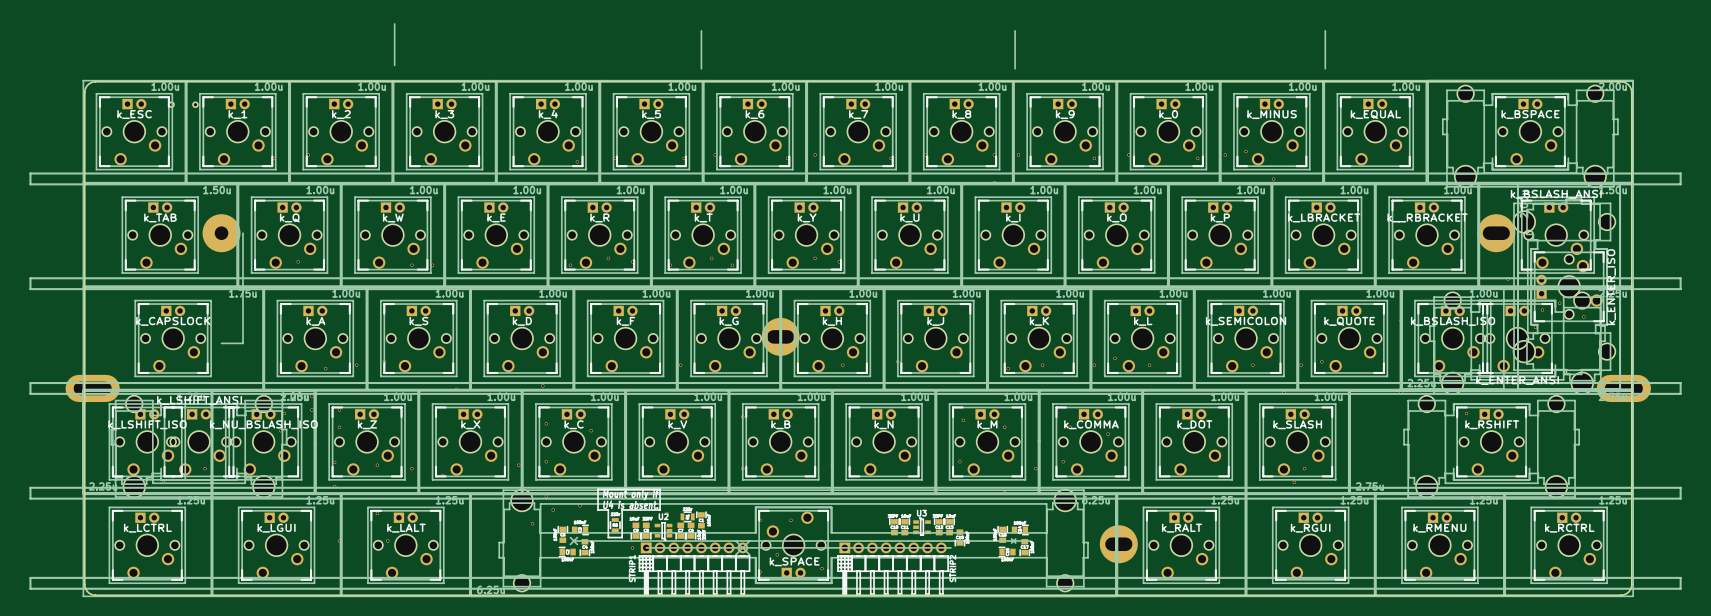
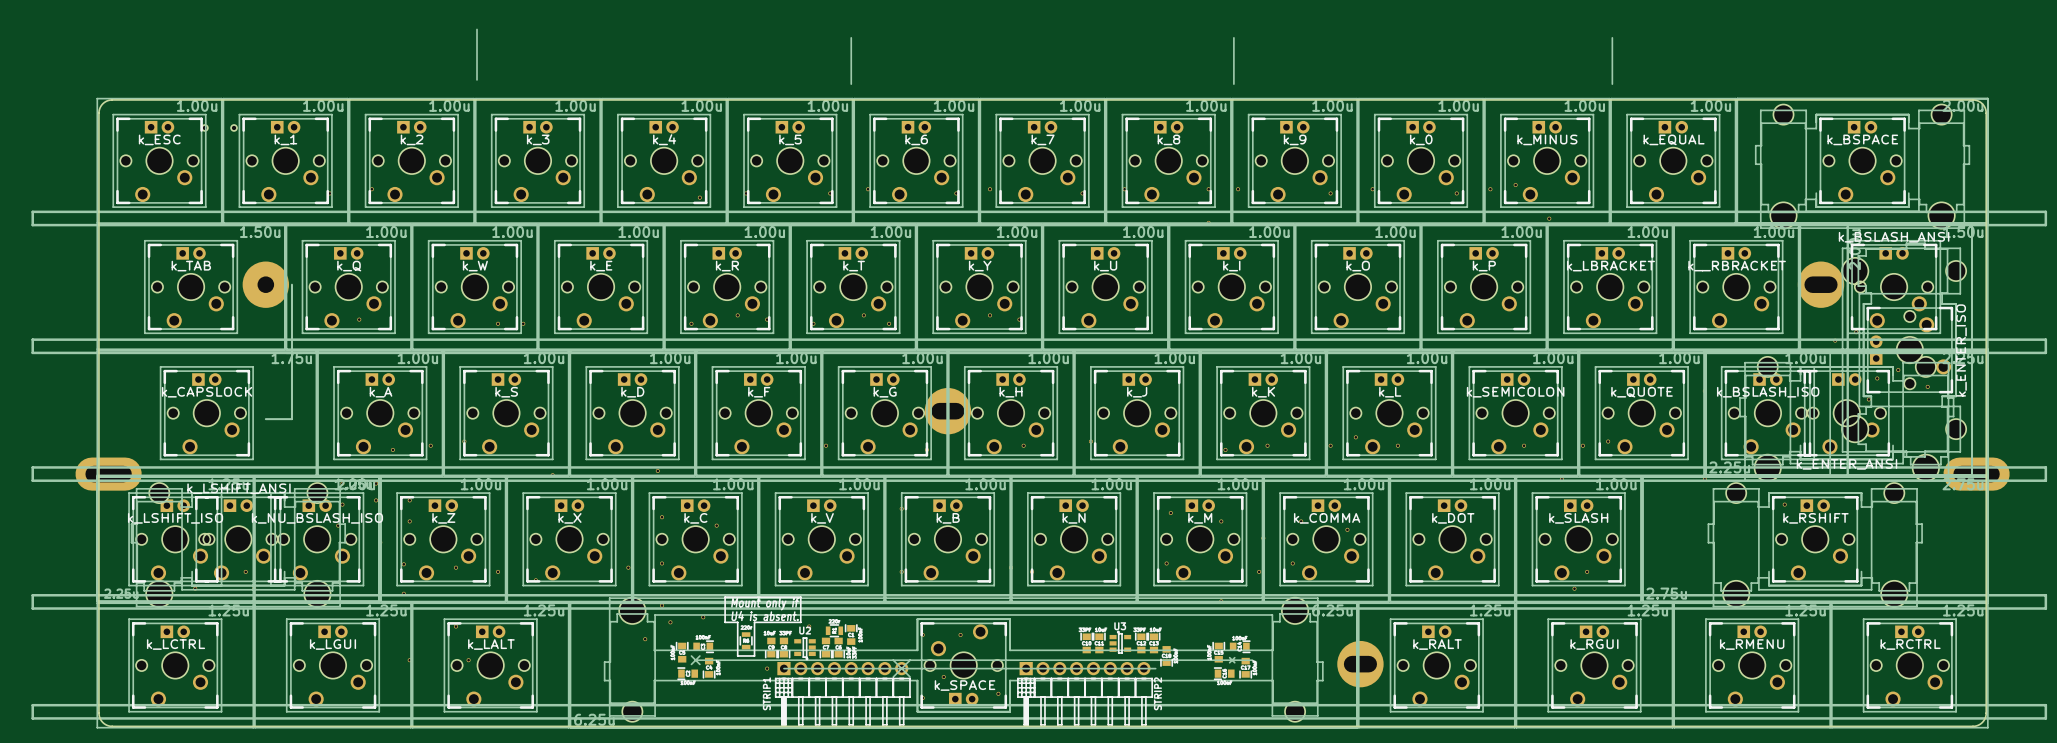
part footprint: [82, 80, 186, 184] -> [96, 98, 223, 224]
part footprint: [186, 80, 290, 184] -> [222, 98, 349, 224]
part footprint: [289, 80, 393, 184] -> [349, 98, 475, 224]
part footprint: [393, 80, 497, 184] -> [475, 98, 601, 224]
part footprint: [496, 80, 600, 184] -> [601, 98, 727, 224]
part footprint: [600, 80, 703, 184] -> [727, 98, 854, 224]
part footprint: [703, 80, 807, 184] -> [853, 98, 980, 224]
part footprint: [806, 80, 910, 184] -> [979, 98, 1106, 224]
part footprint: [910, 80, 1014, 184] -> [1105, 98, 1232, 224]
part footprint: [1013, 80, 1117, 184] -> [1232, 98, 1358, 224]
part footprint: [1117, 80, 1220, 184] -> [1358, 98, 1484, 224]
part footprint: [1220, 80, 1324, 184] -> [1484, 98, 1610, 224]
part footprint: [1323, 80, 1427, 184] -> [1610, 98, 1737, 224]
part footprint: [1427, 80, 1634, 184] -> [1736, 98, 1989, 224]
part footprint: [82, 183, 238, 287] -> [96, 224, 286, 350]
part footprint: [238, 183, 341, 287] -> [286, 224, 412, 350]
part footprint: [341, 183, 445, 287] -> [412, 224, 538, 350]
part footprint: [444, 183, 548, 287] -> [538, 224, 664, 350]
part footprint: [548, 183, 652, 287] -> [664, 224, 790, 350]
part footprint: [651, 183, 755, 287] -> [790, 224, 917, 350]
part footprint: [755, 183, 858, 287] -> [916, 224, 1043, 350]
part footprint: [858, 183, 962, 287] -> [1042, 224, 1169, 350]
part footprint: [961, 183, 1065, 287] -> [1169, 224, 1295, 350]
part footprint: [1065, 183, 1169, 287] -> [1295, 224, 1421, 350]
part footprint: [1168, 183, 1272, 287] -> [1421, 224, 1547, 350]
part footprint: [1272, 183, 1376, 287] -> [1547, 224, 1673, 350]
part footprint: [1375, 183, 1479, 287] -> [1673, 224, 1800, 350]
part footprint: [1478, 183, 1634, 287] -> [1799, 224, 1989, 350]
part footprint: [1517, 183, 1621, 390] -> [1847, 224, 1973, 476]
part footprint: [82, 287, 264, 390] -> [96, 350, 317, 476]
part footprint: [263, 287, 367, 390] -> [317, 350, 444, 476]
part footprint: [367, 287, 471, 390] -> [443, 350, 570, 476]
part footprint: [470, 287, 574, 390] -> [569, 350, 696, 476]
part footprint: [574, 287, 678, 390] -> [696, 350, 822, 476]
part footprint: [677, 287, 781, 390] -> [822, 350, 948, 476]
part footprint: [780, 287, 884, 390] -> [948, 350, 1074, 476]
part footprint: [884, 287, 988, 390] -> [1074, 350, 1200, 476]
part footprint: [987, 287, 1091, 390] -> [1200, 350, 1327, 476]
part footprint: [1091, 287, 1195, 390] -> [1326, 350, 1453, 476]
part footprint: [1194, 287, 1298, 390] -> [1452, 350, 1579, 476]
part footprint: [1298, 287, 1401, 390] -> [1579, 350, 1705, 476]
part footprint: [1401, 287, 1505, 390] -> [1705, 350, 1831, 476]
part footprint: [1401, 287, 1634, 390] -> [1705, 350, 1989, 476]
part footprint: [1401, 287, 1634, 395] -> [1705, 350, 1989, 482]
part footprint: [82, 390, 212, 494] -> [96, 476, 254, 603]
part footprint: [212, 390, 316, 494] -> [254, 476, 380, 603]
part footprint: [315, 390, 419, 494] -> [380, 476, 507, 603]
part footprint: [419, 390, 522, 494] -> [506, 476, 633, 603]
part footprint: [522, 390, 626, 494] -> [632, 476, 759, 603]
part footprint: [625, 390, 729, 494] -> [759, 476, 885, 603]
part footprint: [729, 390, 833, 494] -> [885, 476, 1011, 603]
part footprint: [832, 390, 936, 494] -> [1011, 476, 1137, 603]
part footprint: [936, 390, 1039, 494] -> [1137, 476, 1264, 603]
part footprint: [1039, 390, 1143, 494] -> [1263, 476, 1390, 603]
part footprint: [1142, 390, 1246, 494] -> [1389, 476, 1516, 603]
part footprint: [1246, 390, 1350, 494] -> [1515, 476, 1642, 603]
part footprint: [1349, 390, 1634, 494] -> [1642, 476, 1989, 603]
part footprint: [1349, 390, 1634, 498] -> [1642, 476, 1989, 608]
part footprint: [470, 489, 1117, 597] -> [569, 597, 1358, 729]
part footprint: [82, 493, 212, 597] -> [96, 602, 254, 729]
part footprint: [212, 493, 341, 597] -> [254, 602, 412, 729]
part footprint: [341, 493, 471, 597] -> [412, 602, 570, 729]
part footprint: [470, 493, 1117, 597] -> [569, 602, 1358, 729]
part footprint: [1117, 493, 1246, 597] -> [1358, 602, 1516, 729]
part footprint: [1246, 493, 1376, 597] -> [1515, 602, 1673, 729]
part footprint: [1375, 493, 1505, 597] -> [1673, 602, 1831, 729]
part footprint: [1504, 493, 1634, 597] -> [1831, 602, 1989, 729]

